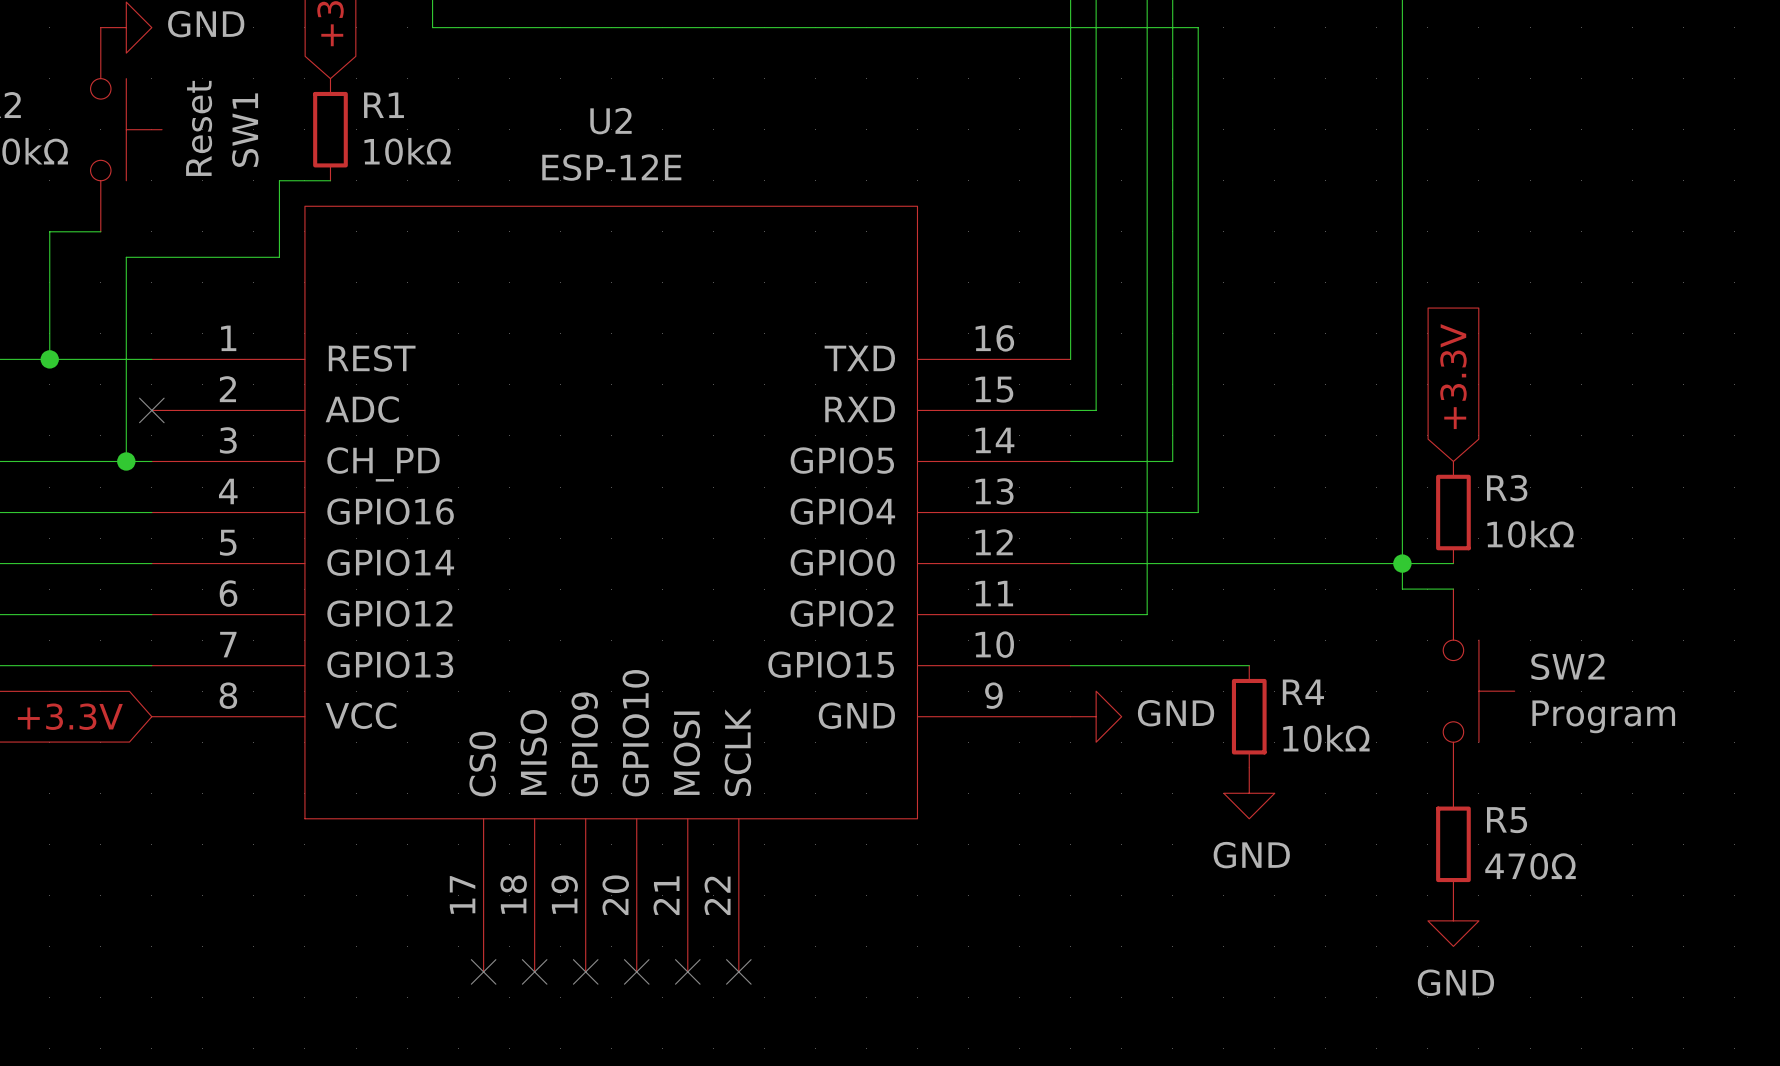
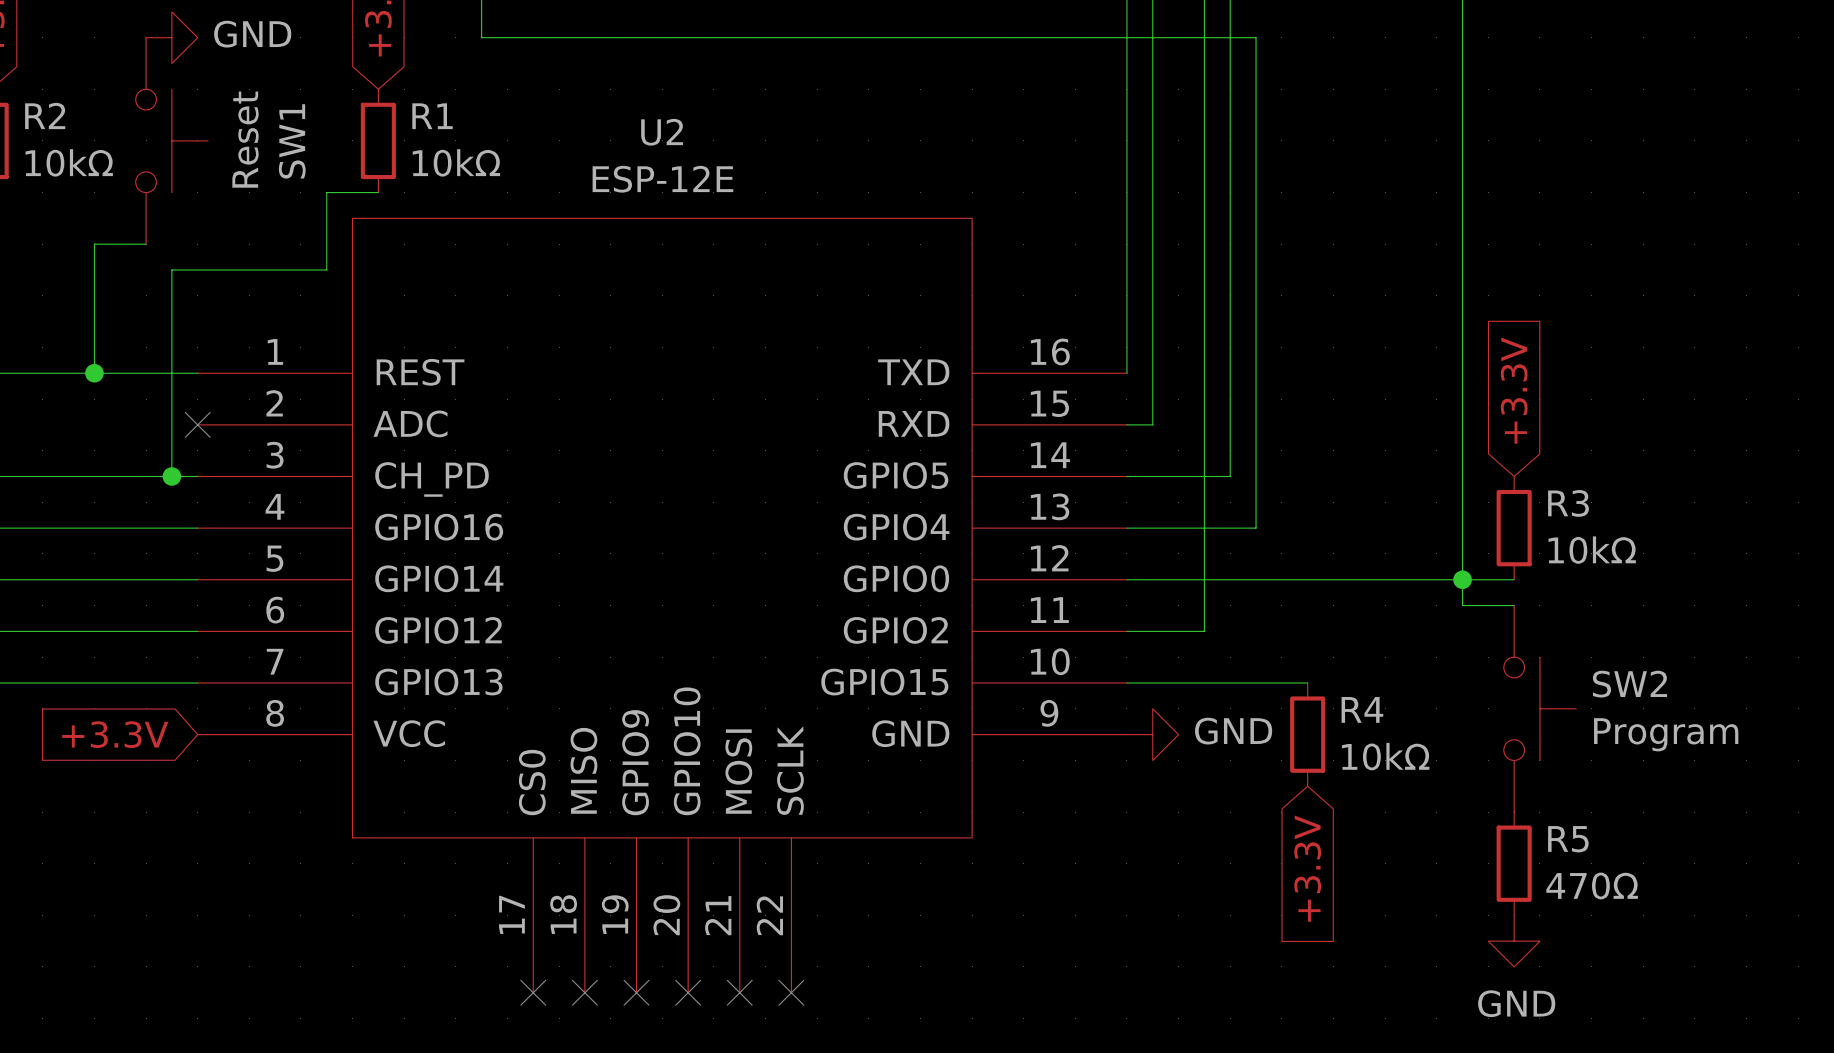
power symbol: GND (1249, 793) -> none
global label: none -> +3.3V (1307, 868)

